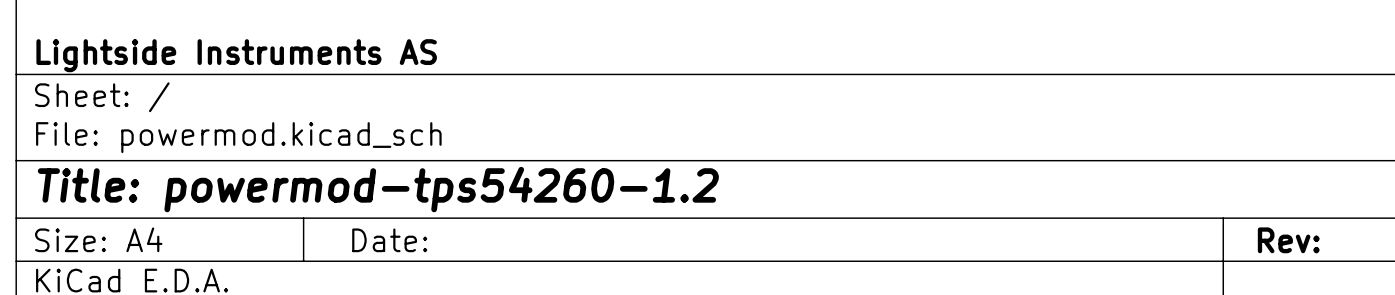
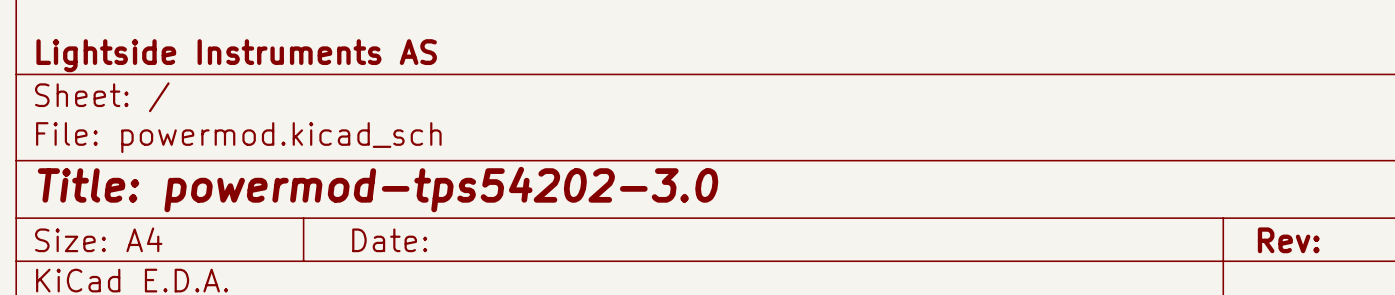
title block: Title: powermod-tps54260-1.2 (378, 189) -> Title: powermod-tps54202-3.0 (378, 189)

